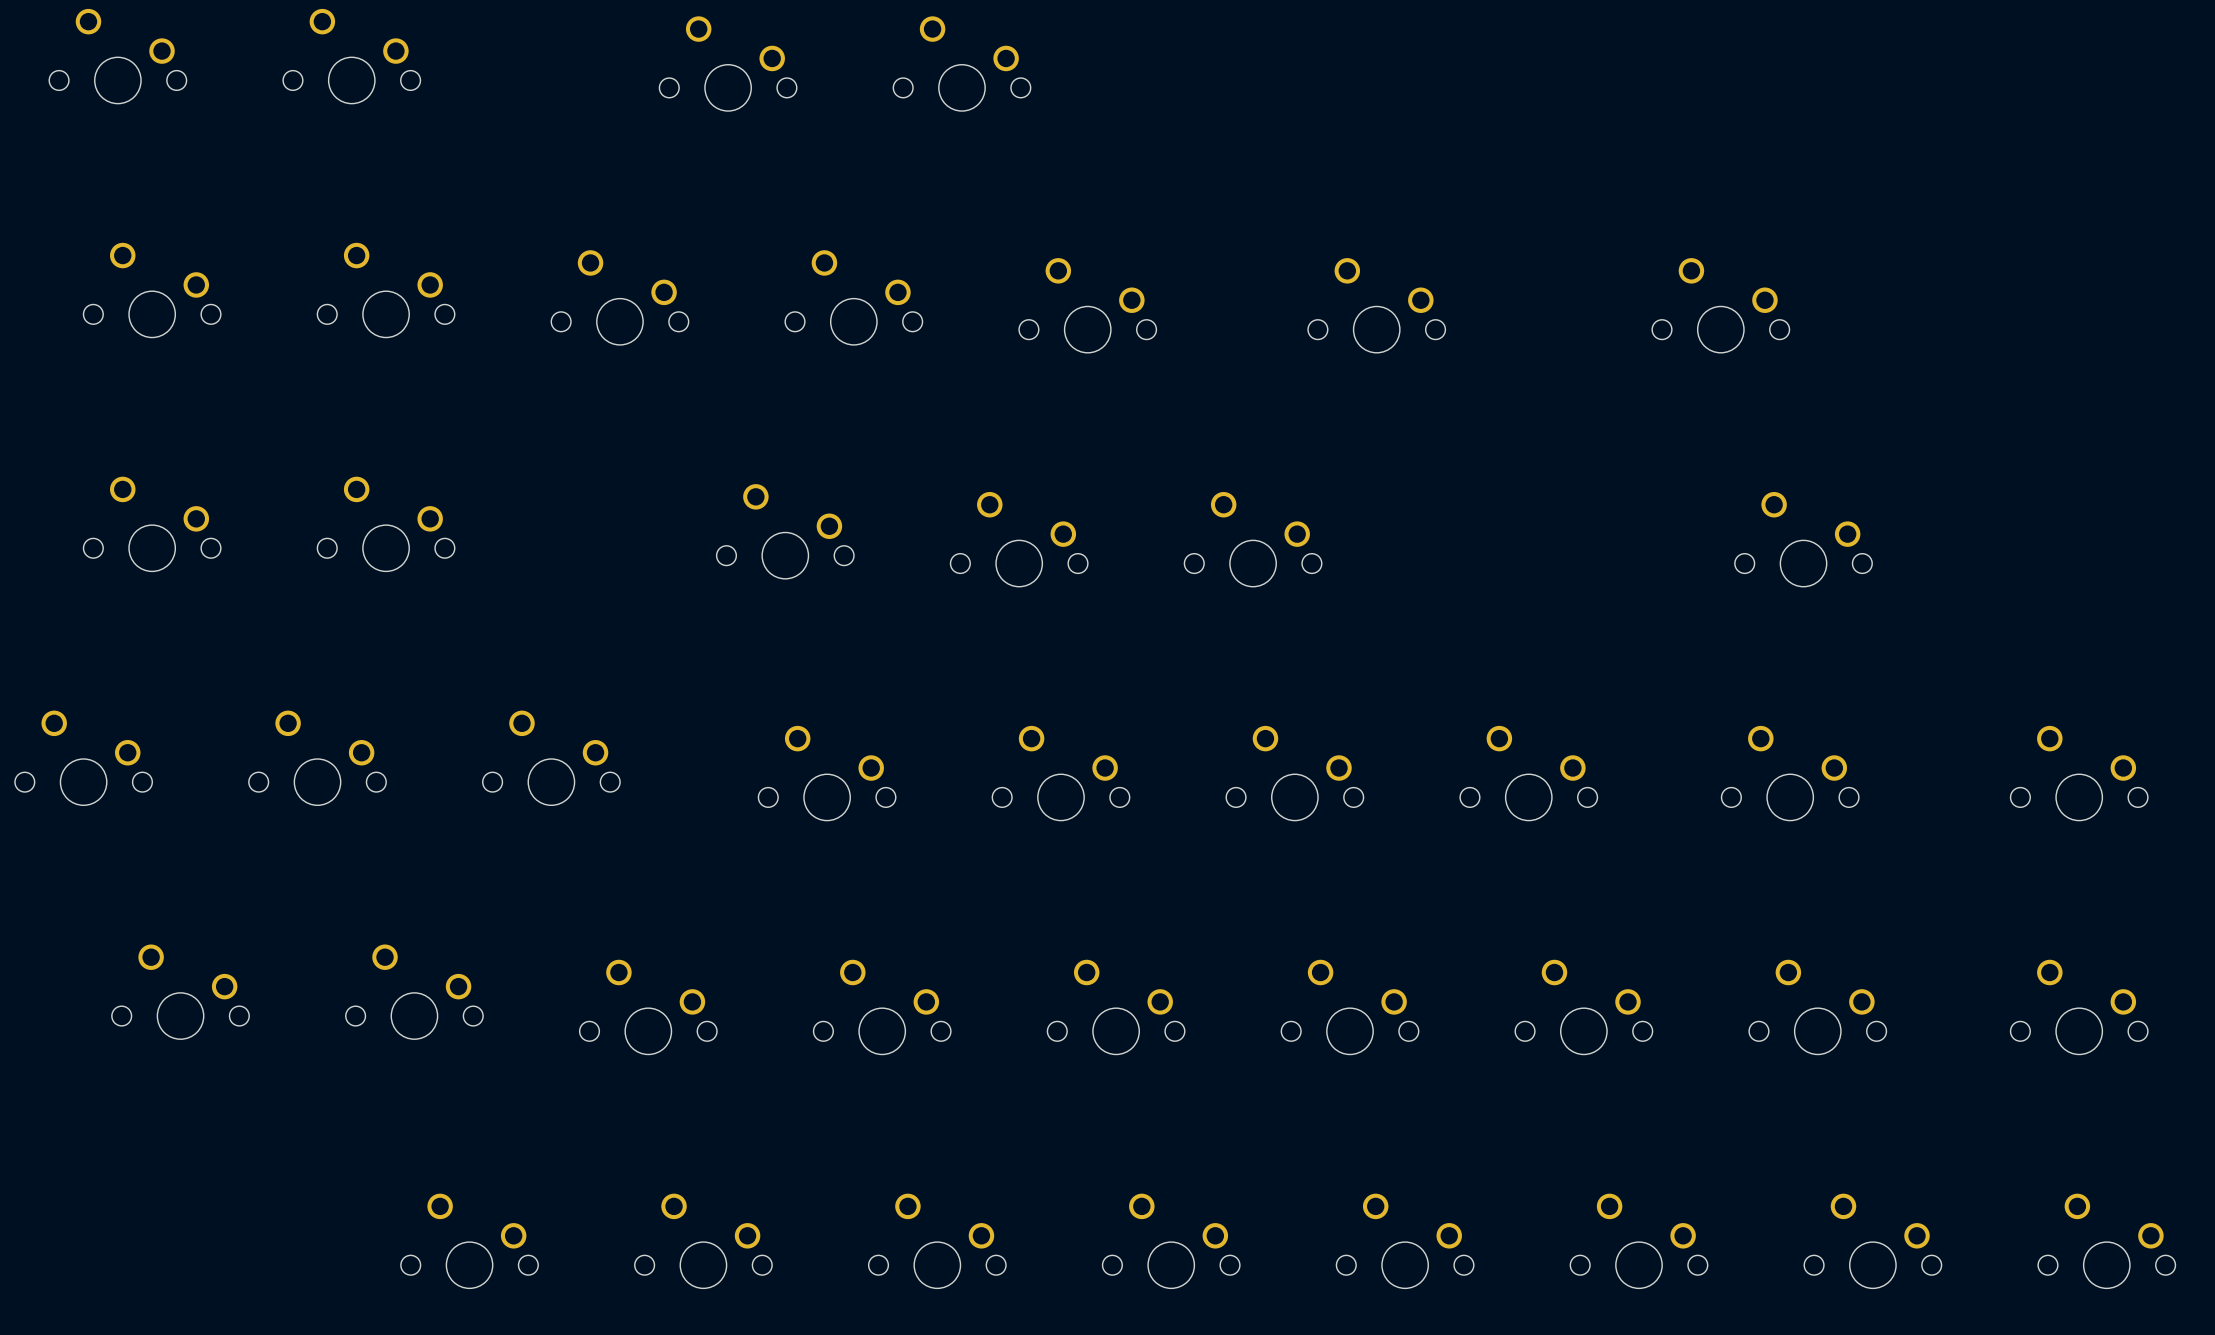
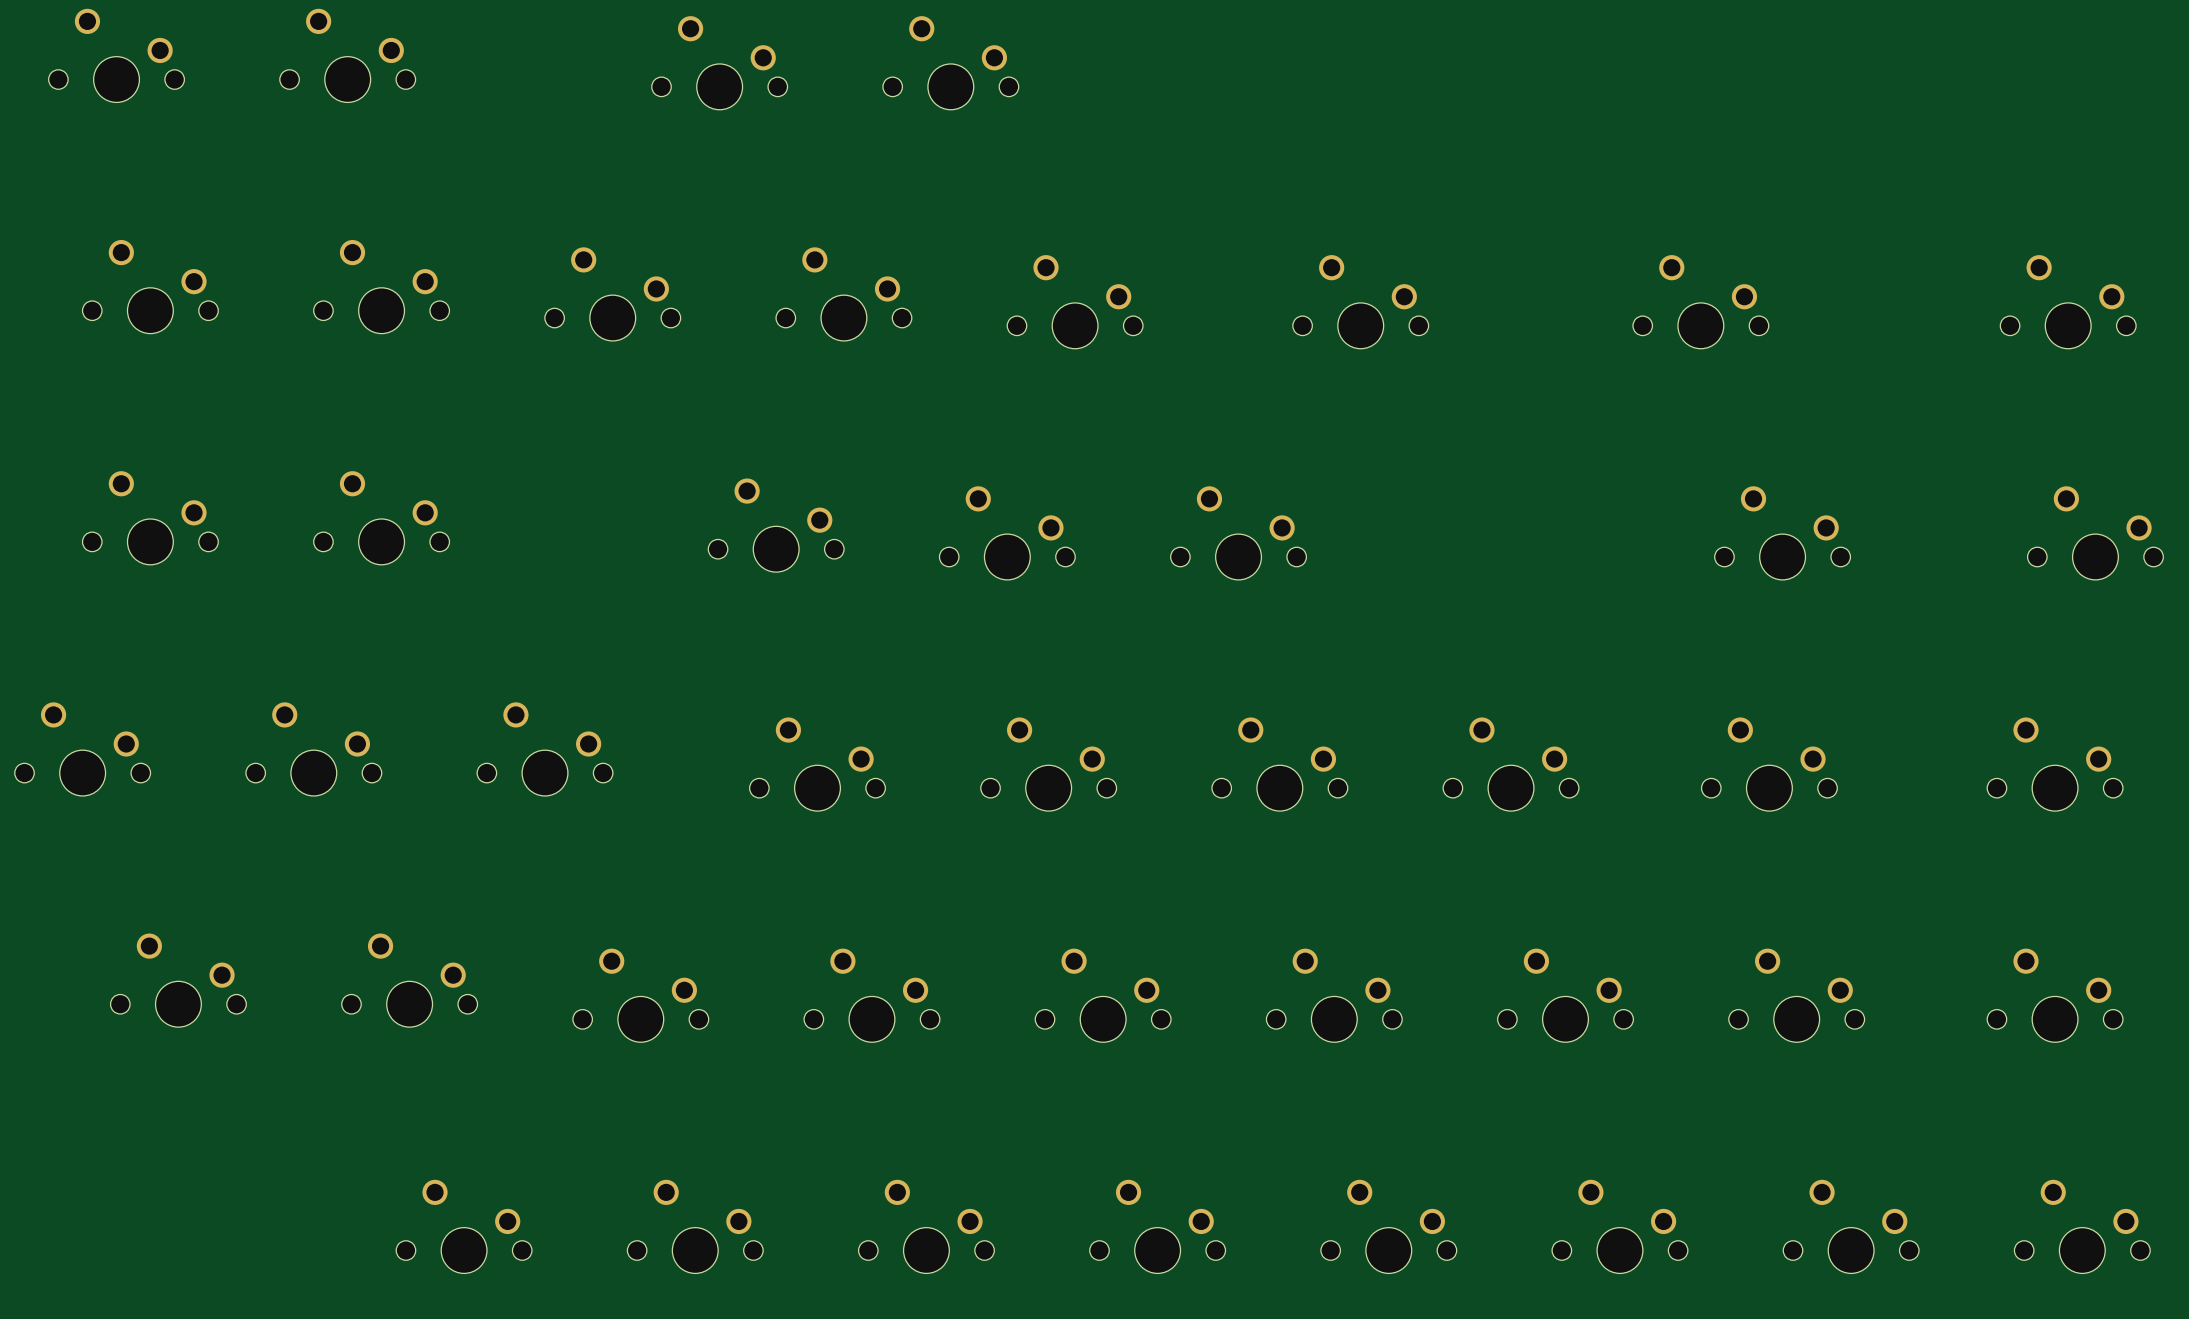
part: none -> (2068, 301)
part: none -> (2095, 533)

